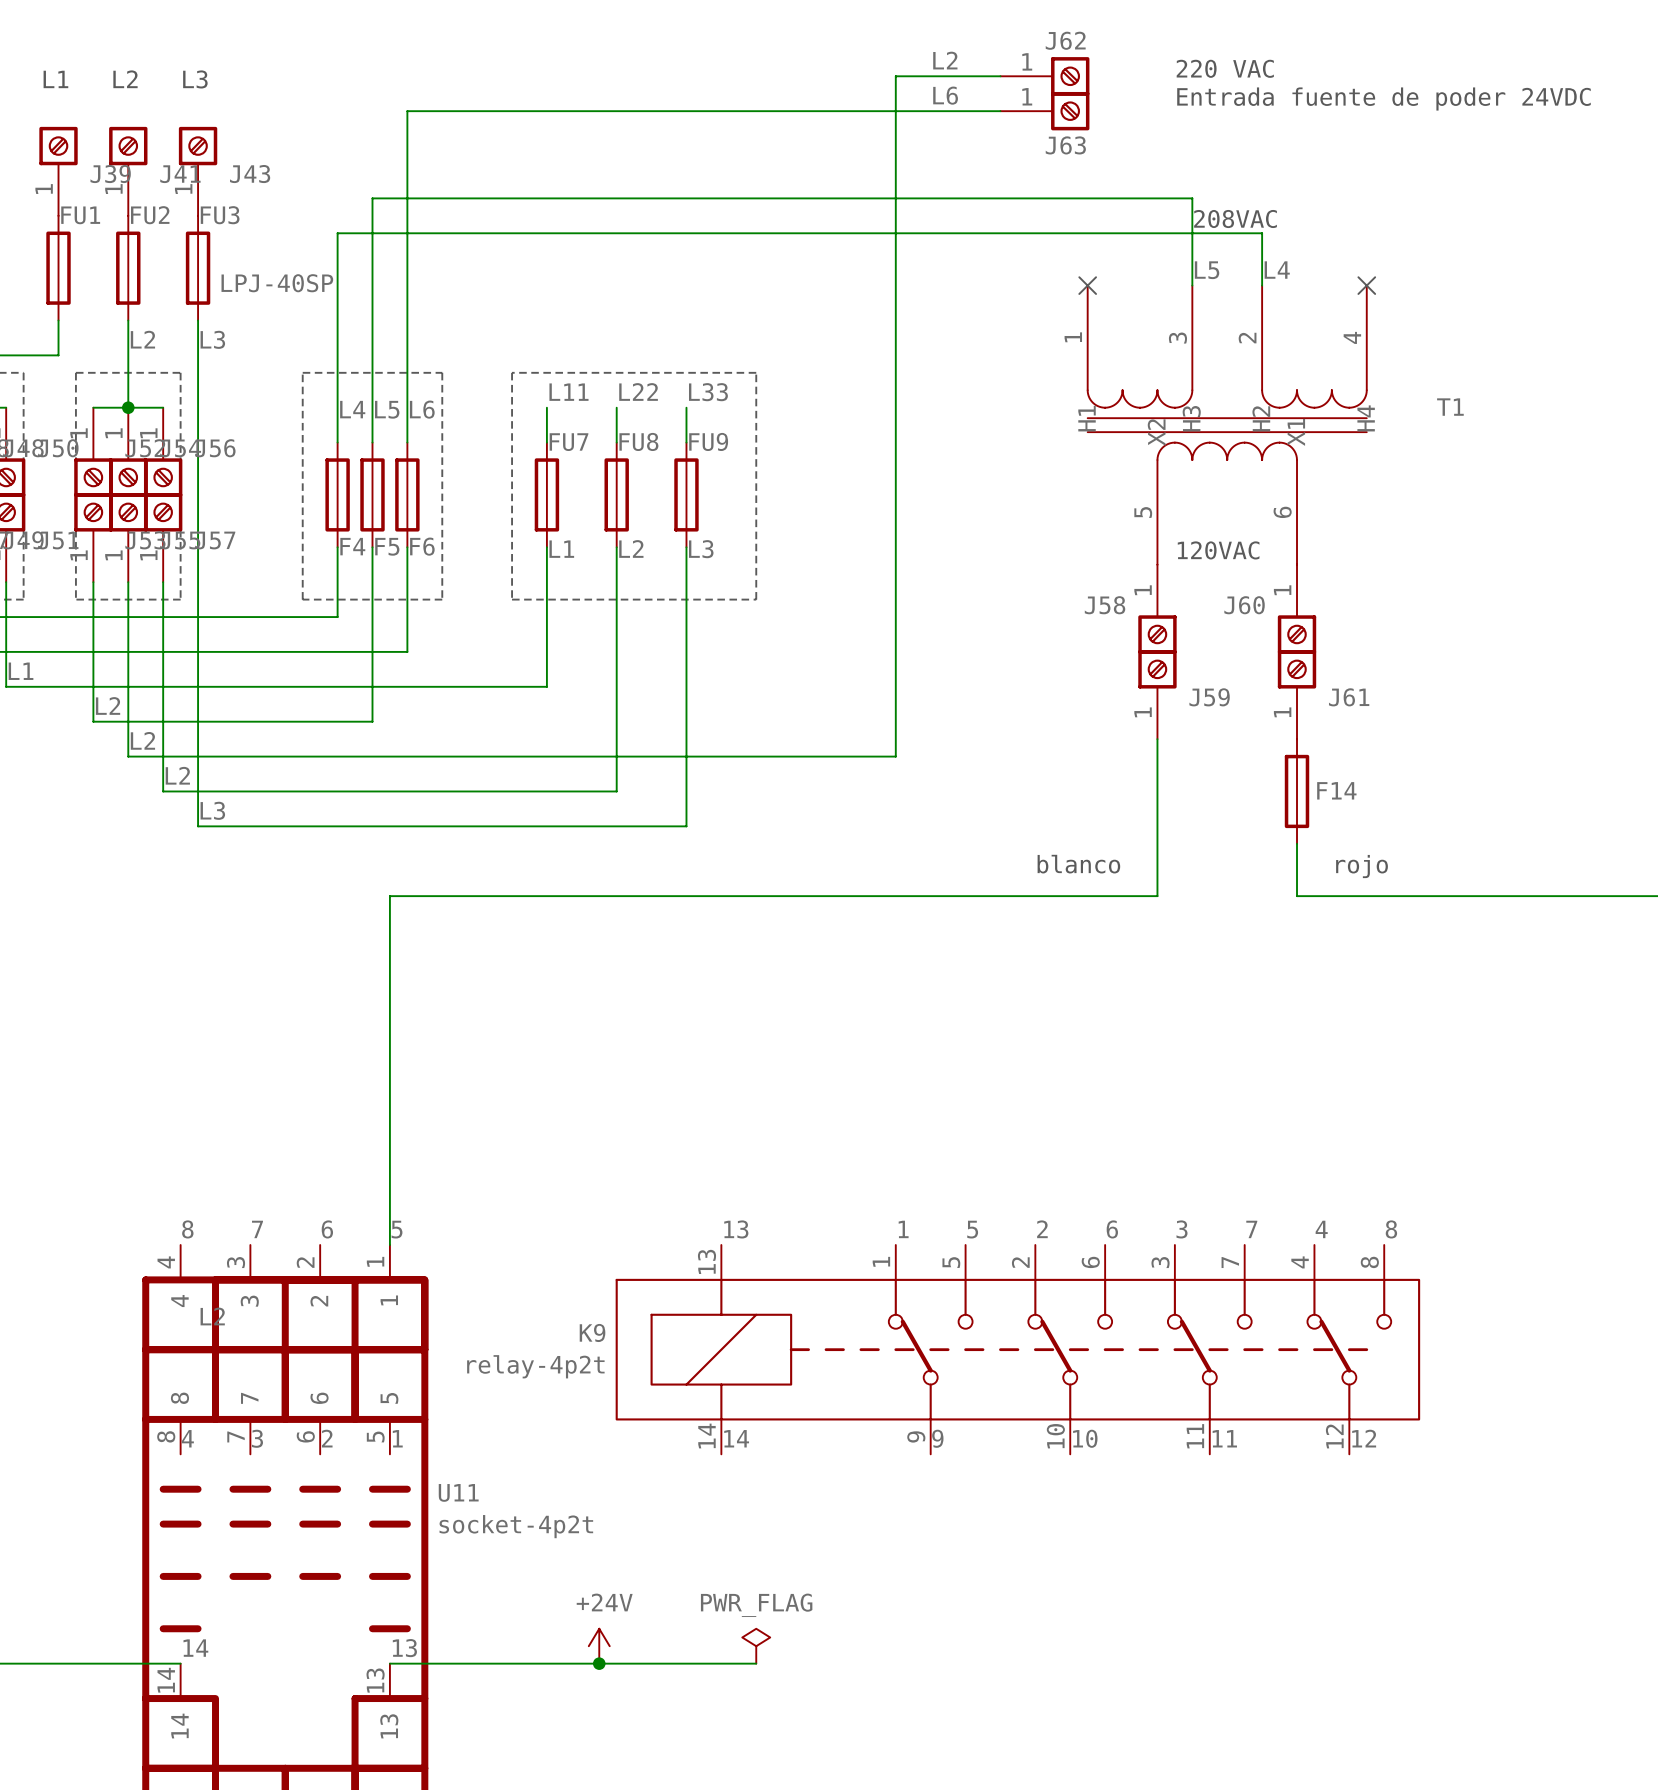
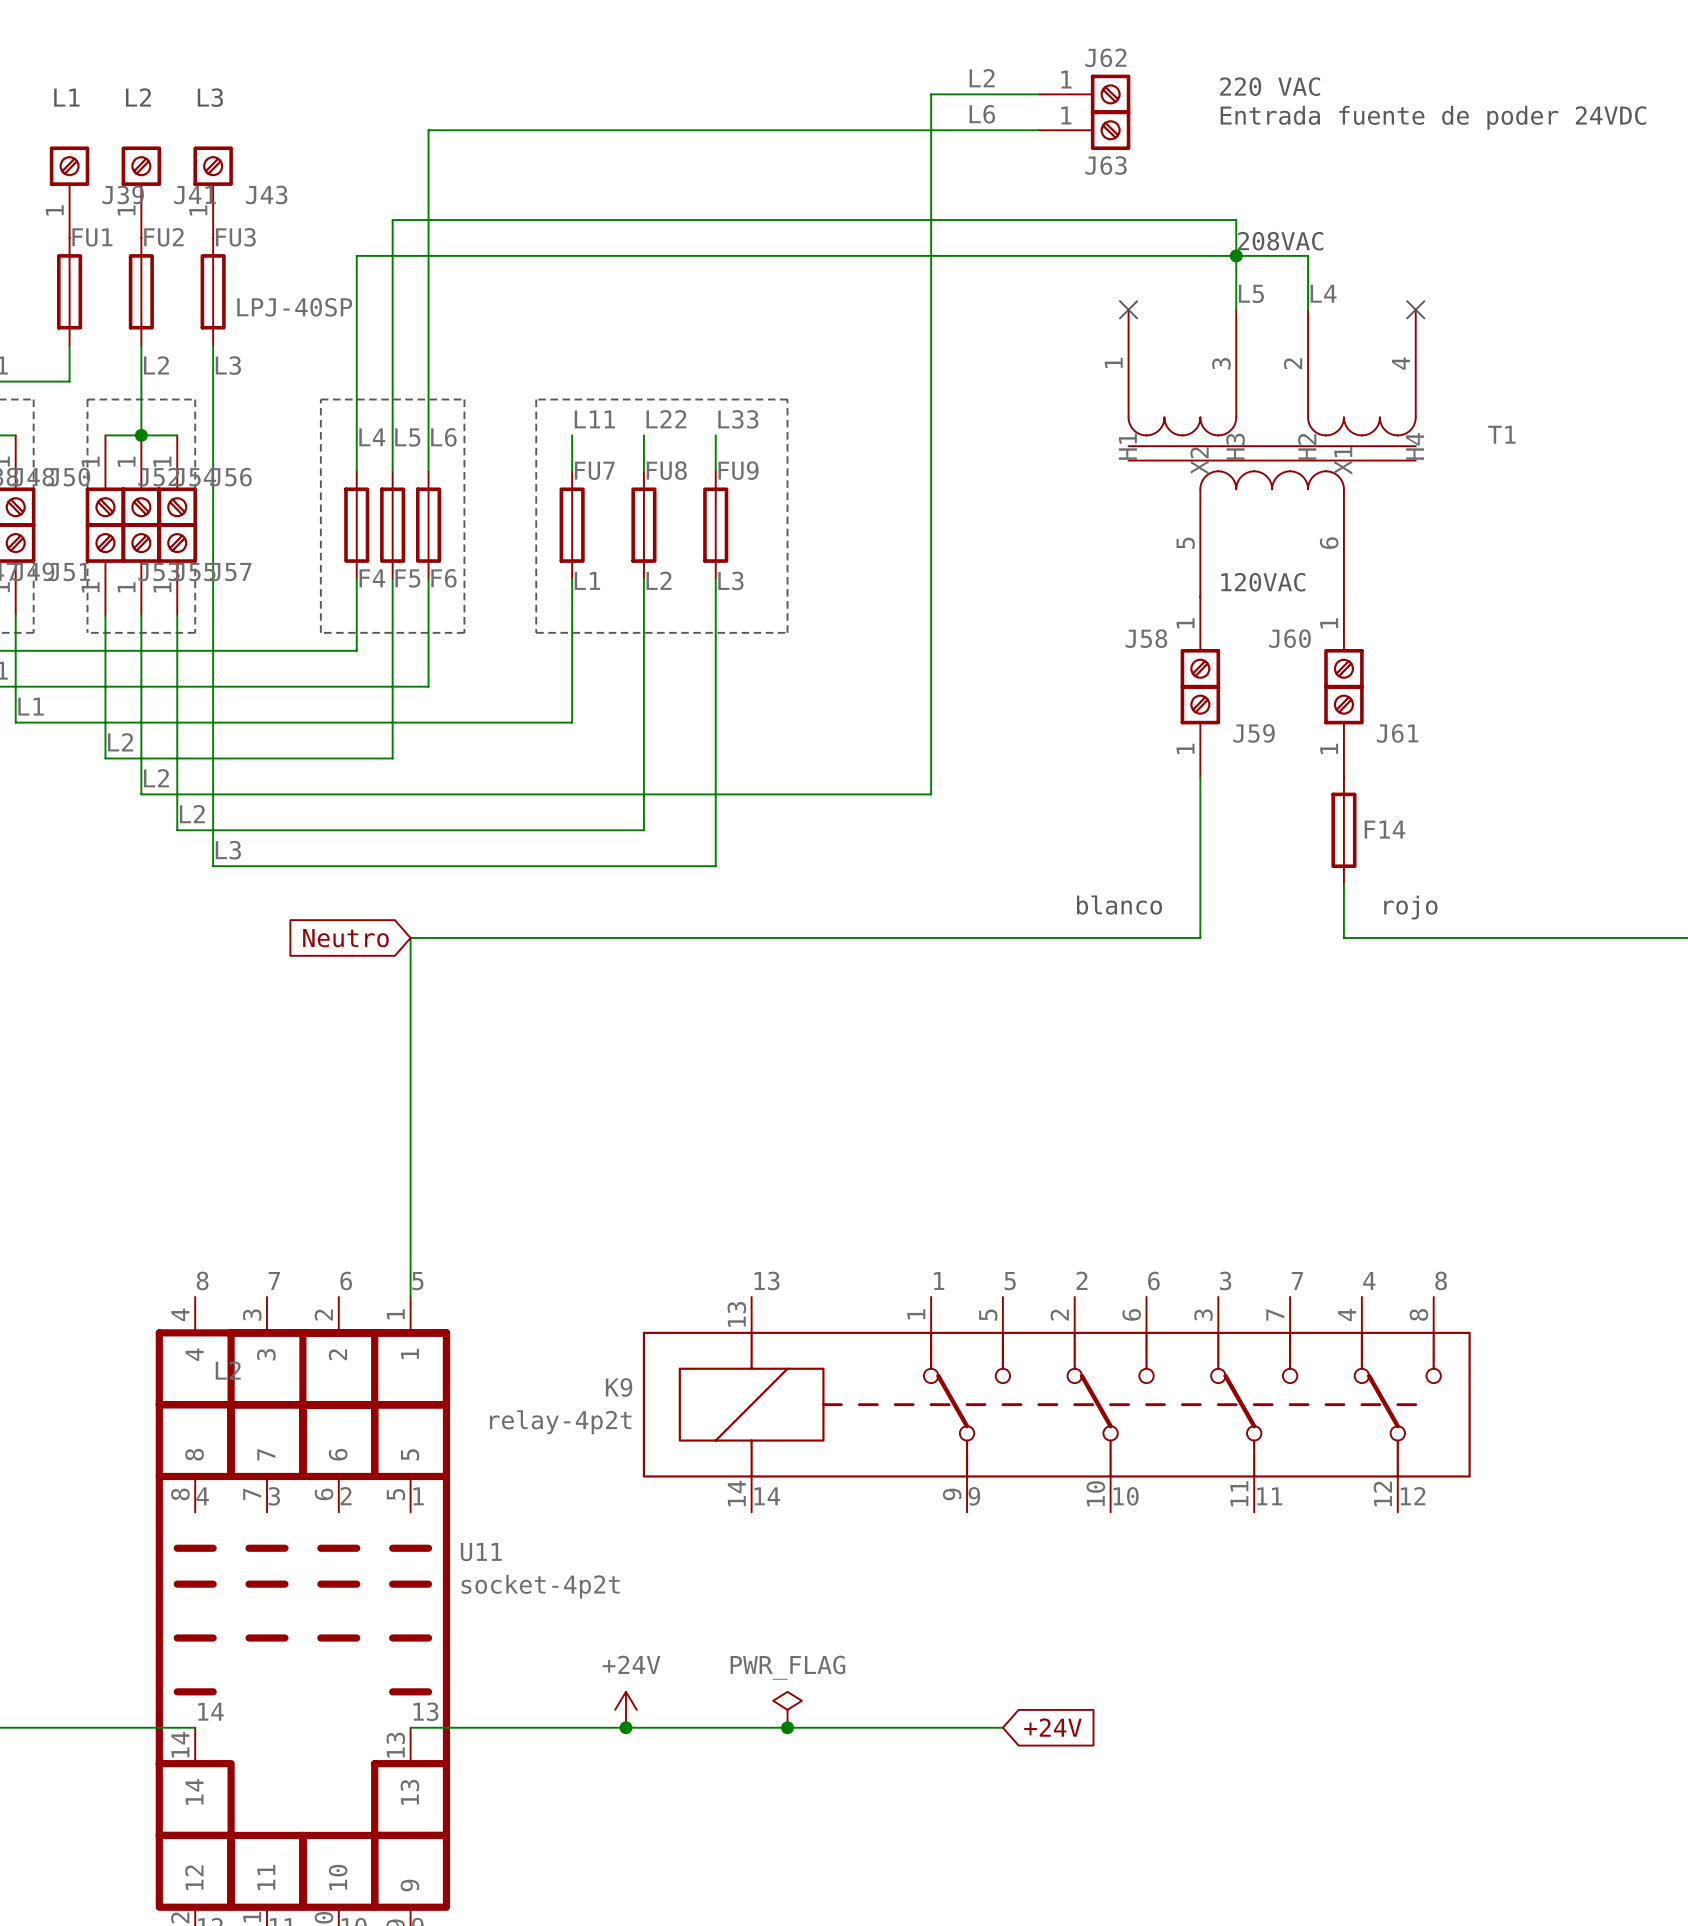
junction: none -> (1236, 255)
global label: none -> Neutro (345, 938)
wire: none -> (787, 1727) (1002, 1727)
junction: none -> (787, 1727)
global label: none -> +24V (1052, 1727)

